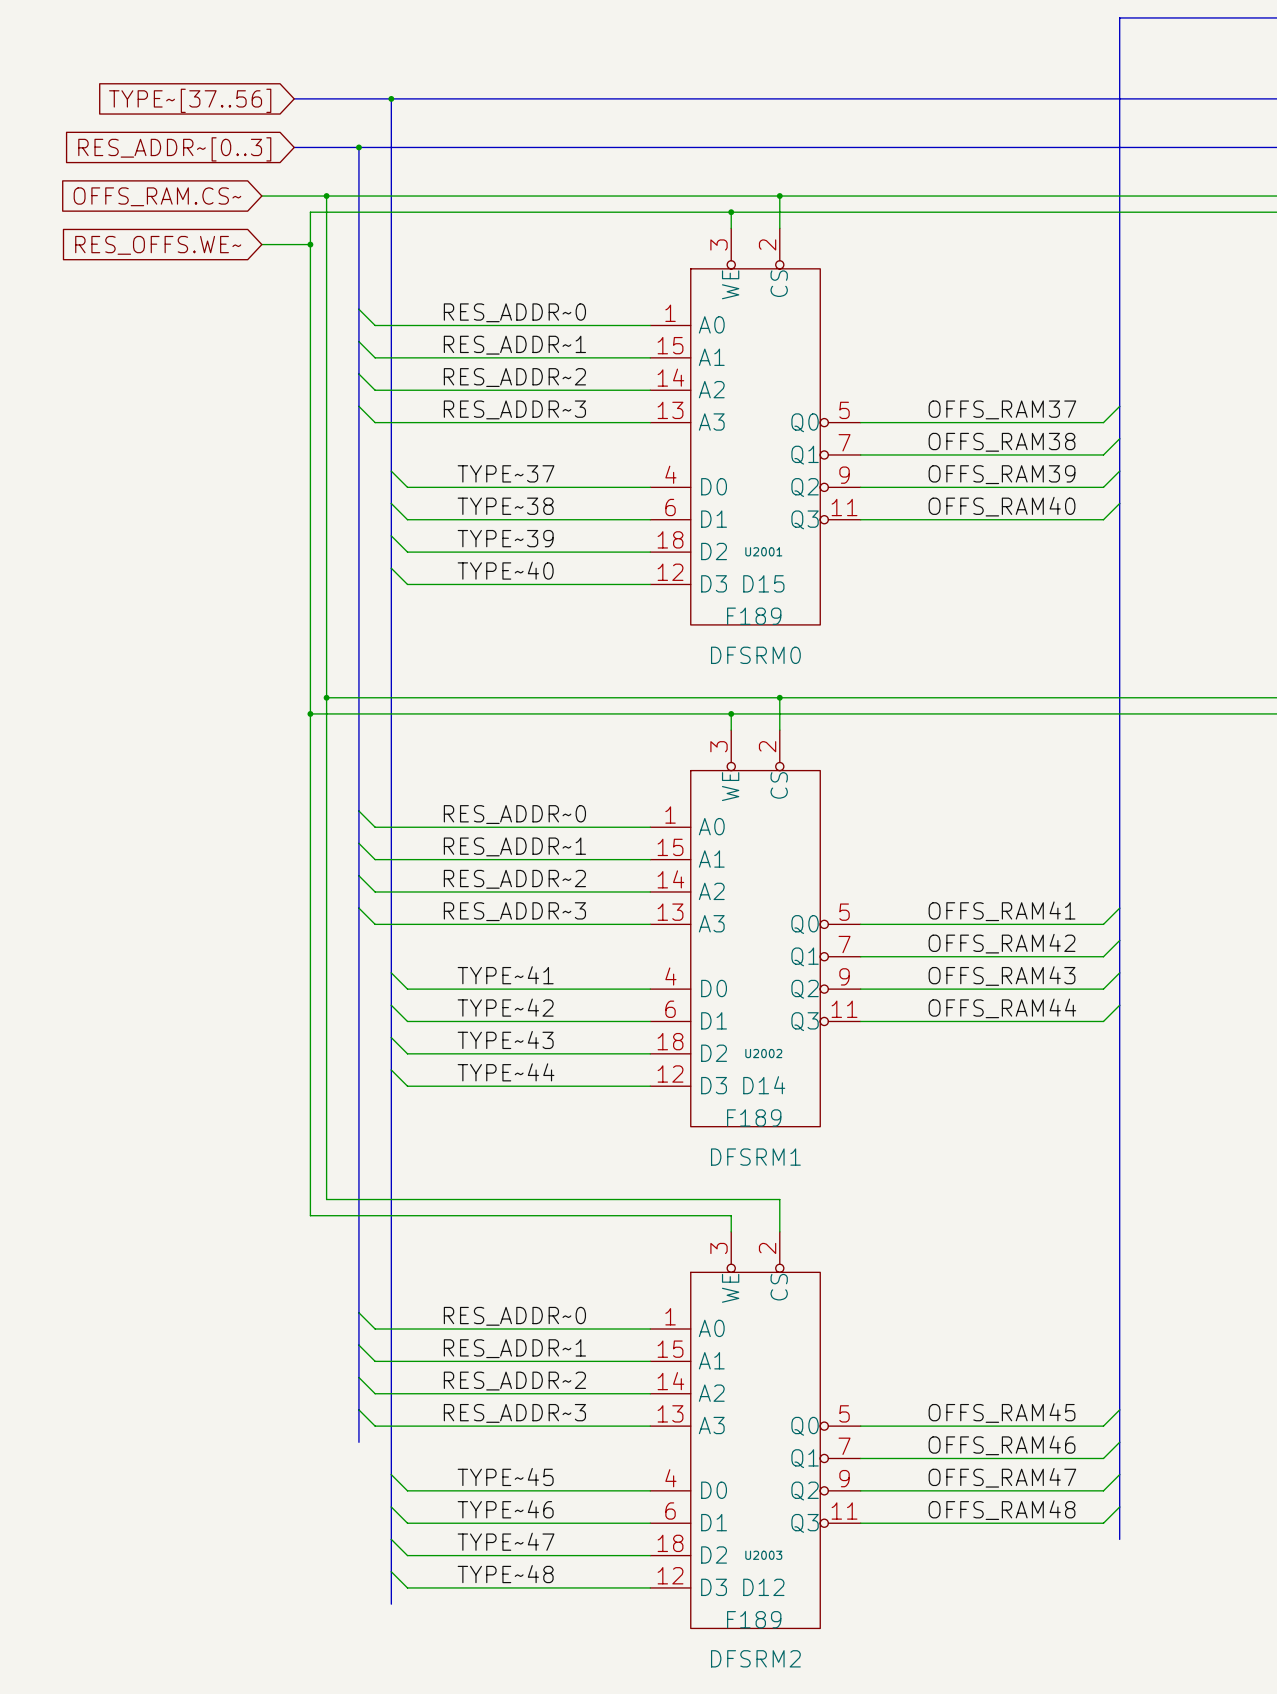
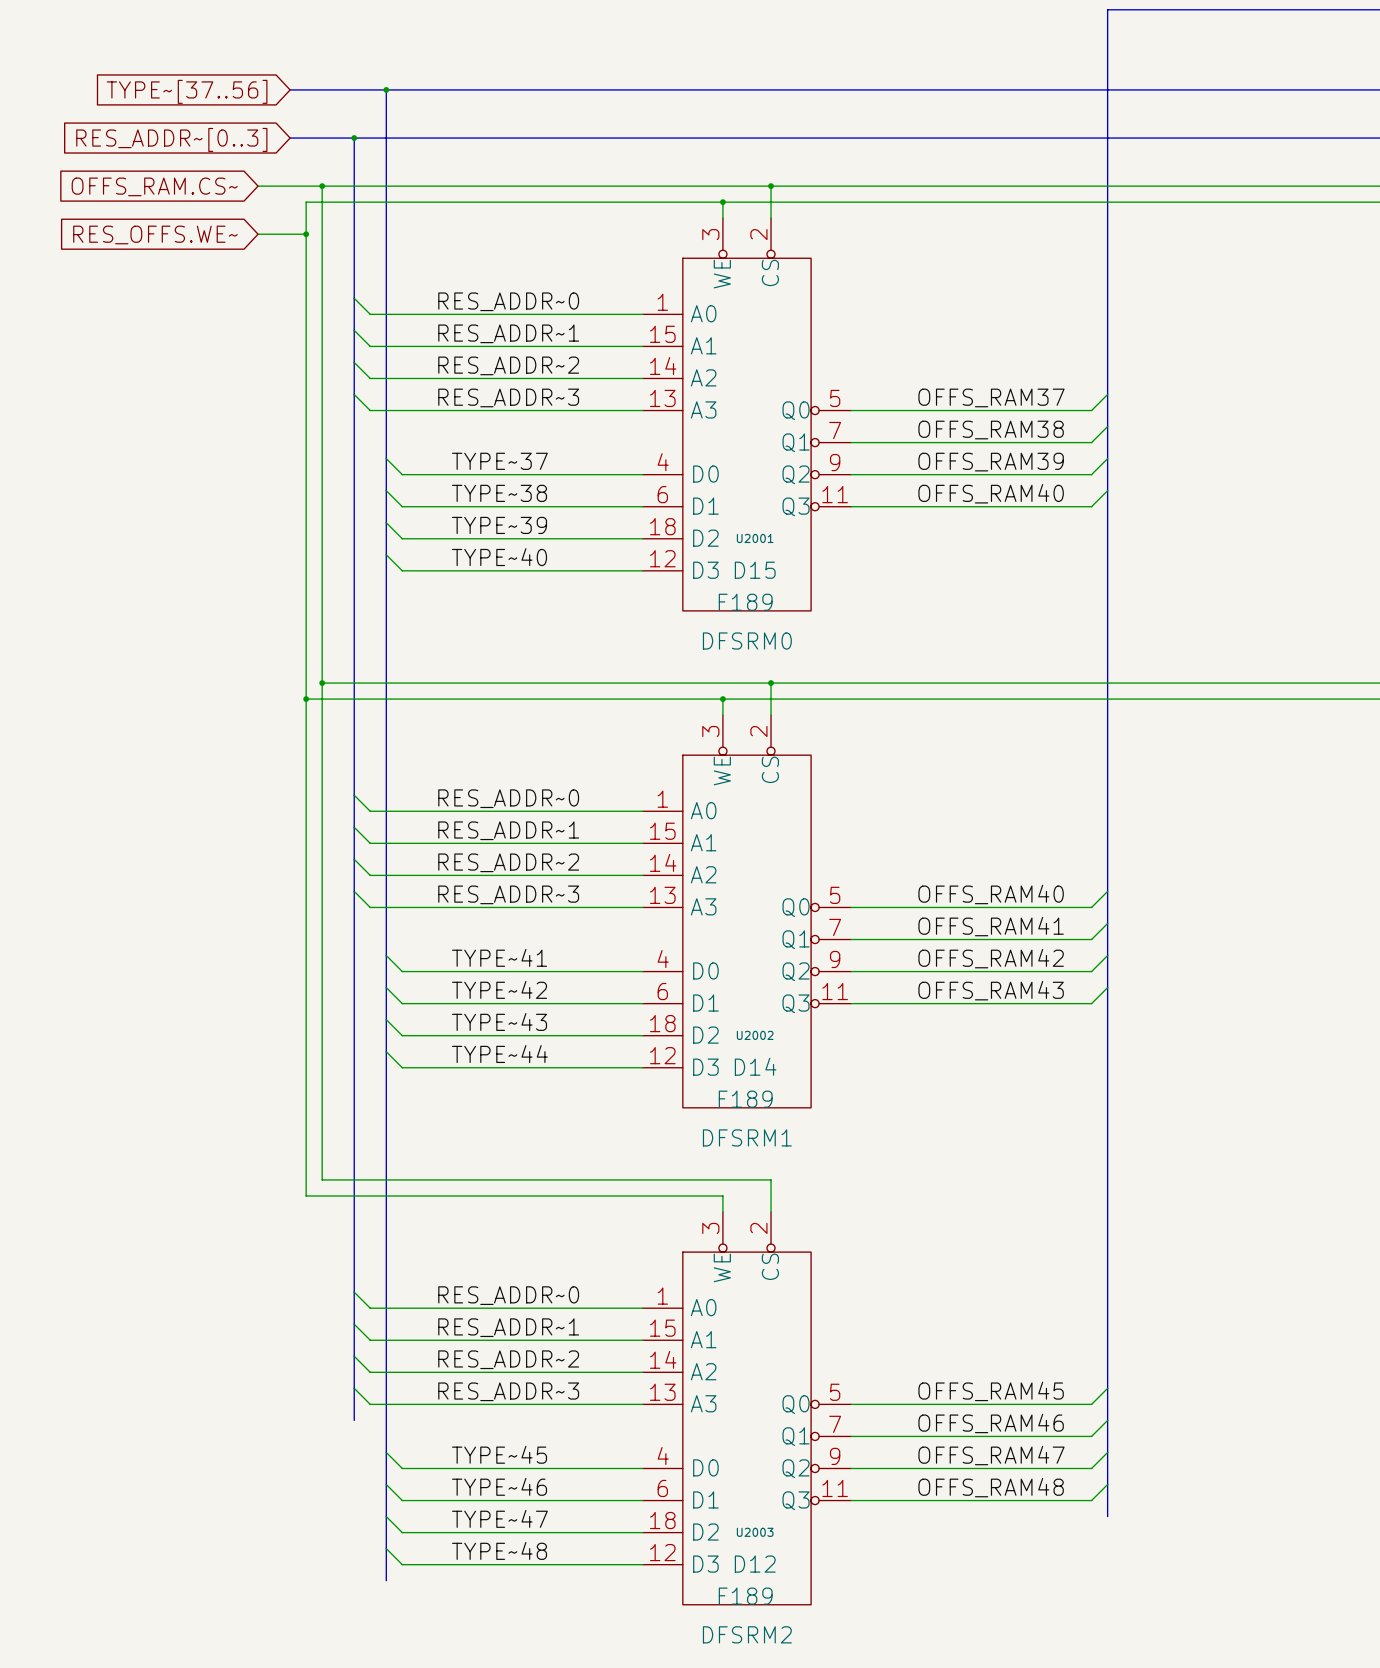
label: OFFS_RAM41 (1002, 911) -> OFFS_RAM40 (991, 894)
label: OFFS_RAM42 (1002, 943) -> OFFS_RAM41 (991, 926)
label: OFFS_RAM43 (1002, 976) -> OFFS_RAM42 (991, 958)
label: OFFS_RAM44 (1002, 1008) -> OFFS_RAM43 (991, 990)

